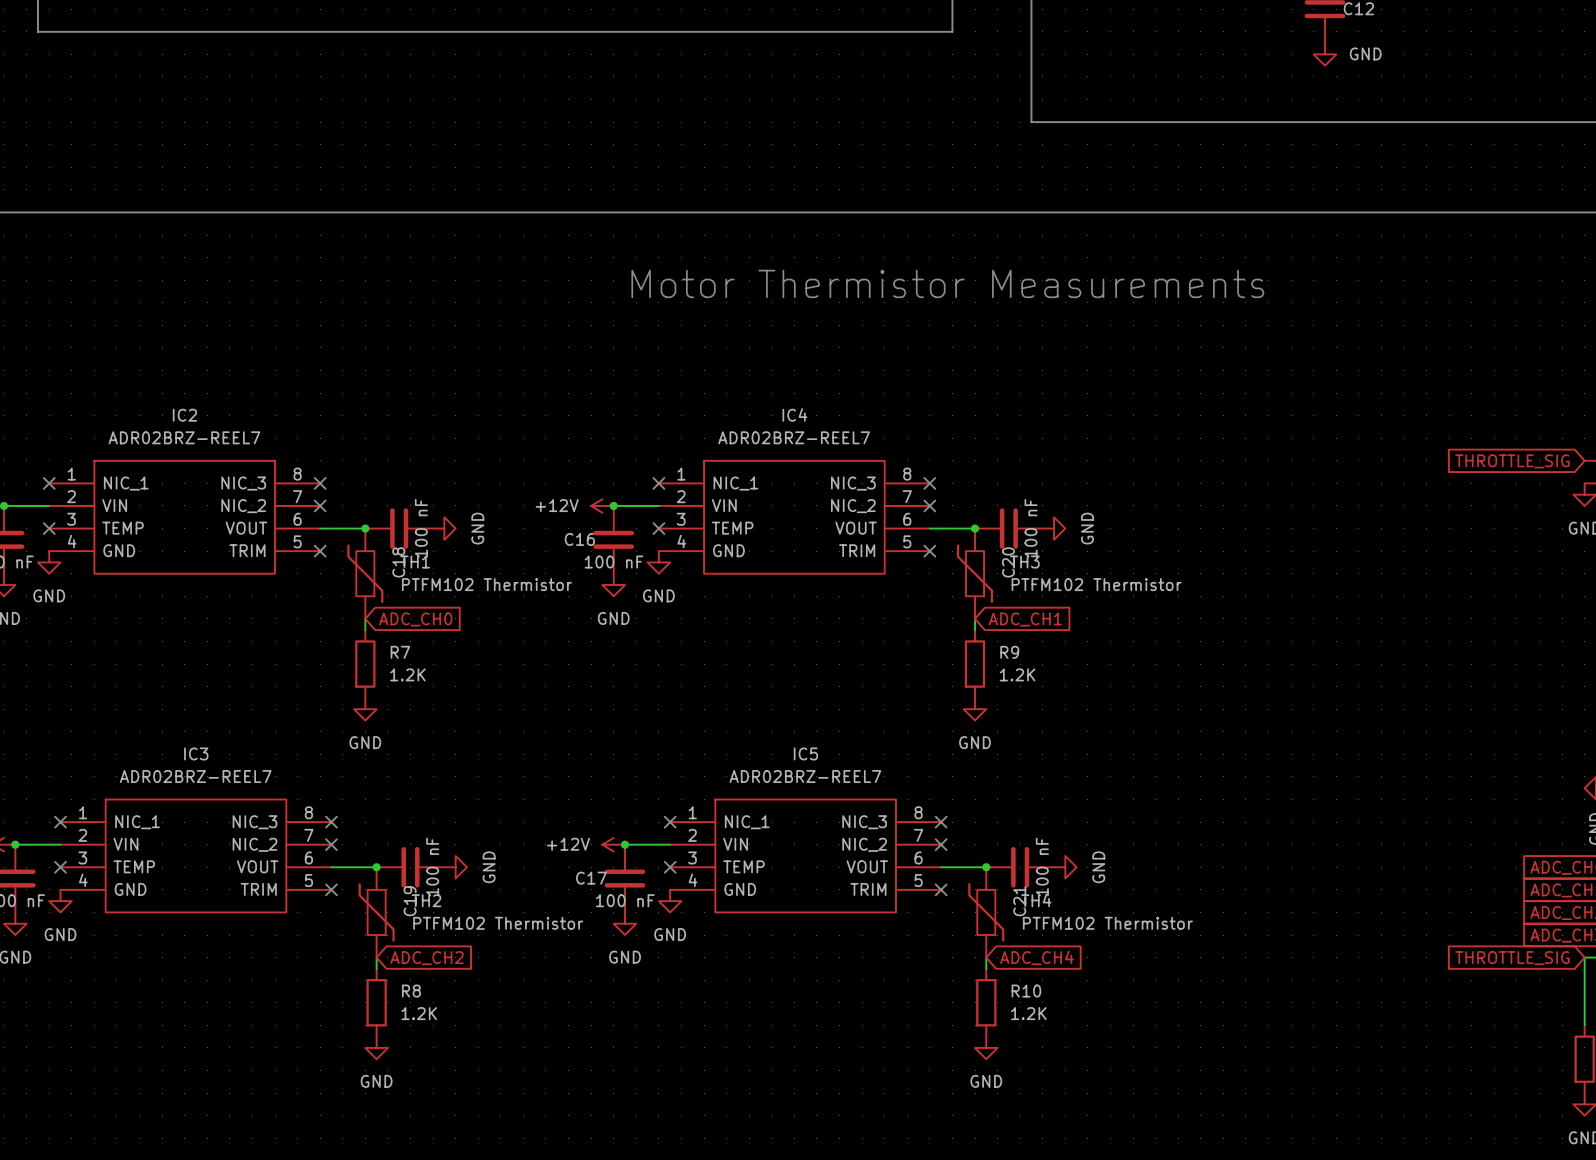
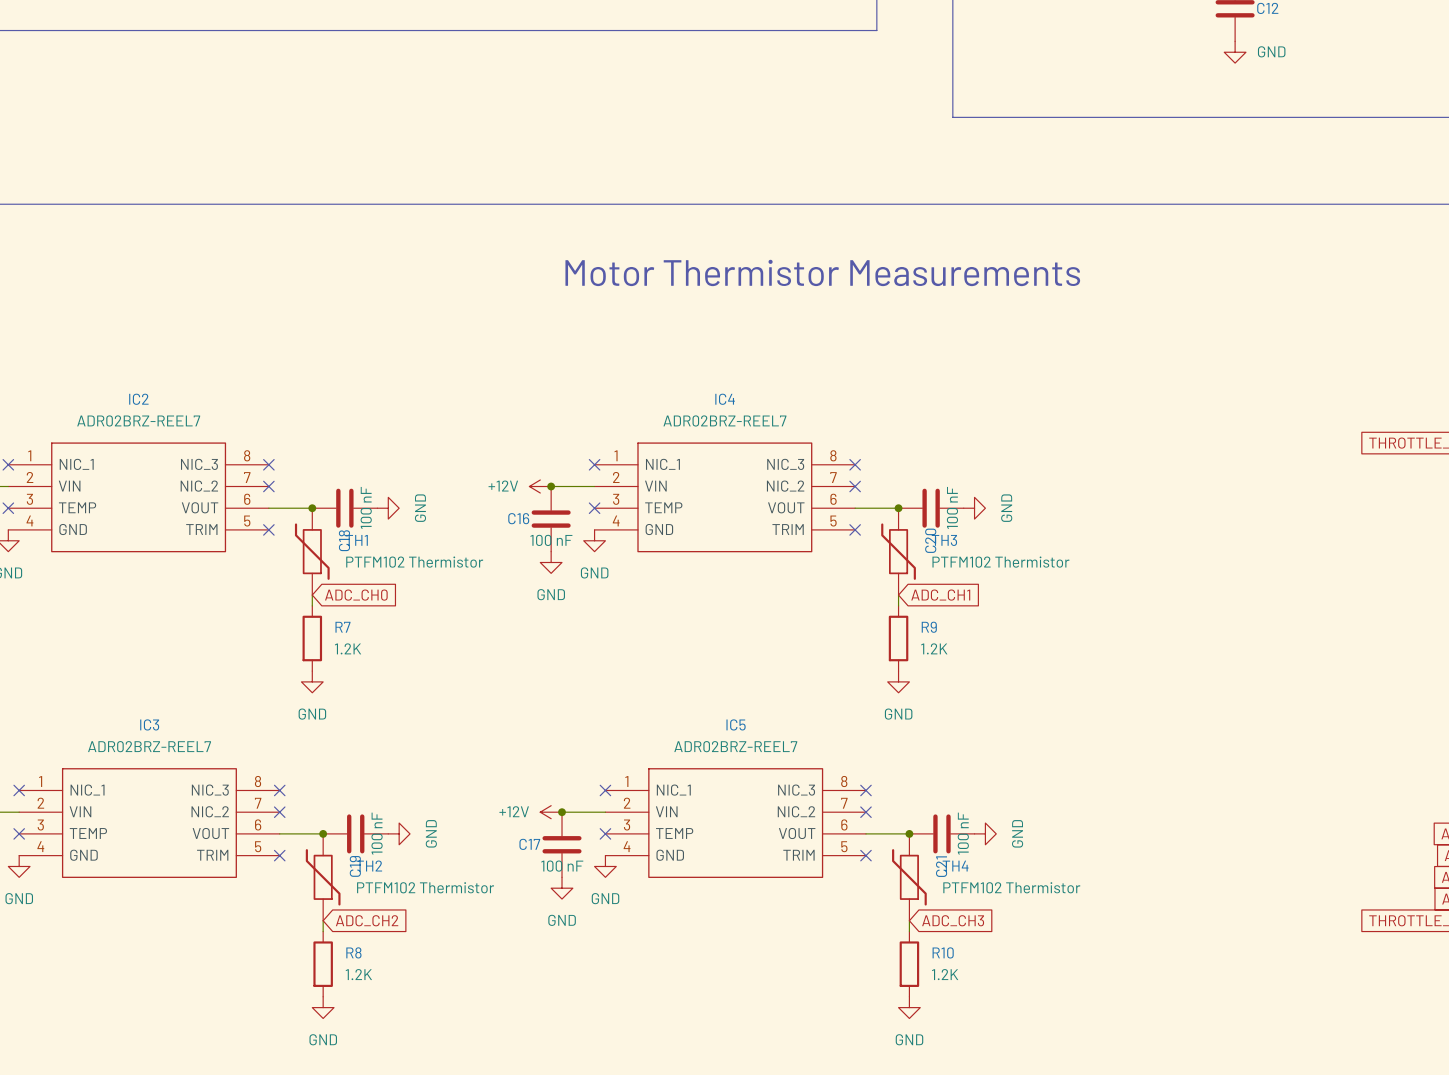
global label: ADC_CH4 (1036, 957) -> ADC_CH3 (953, 920)

